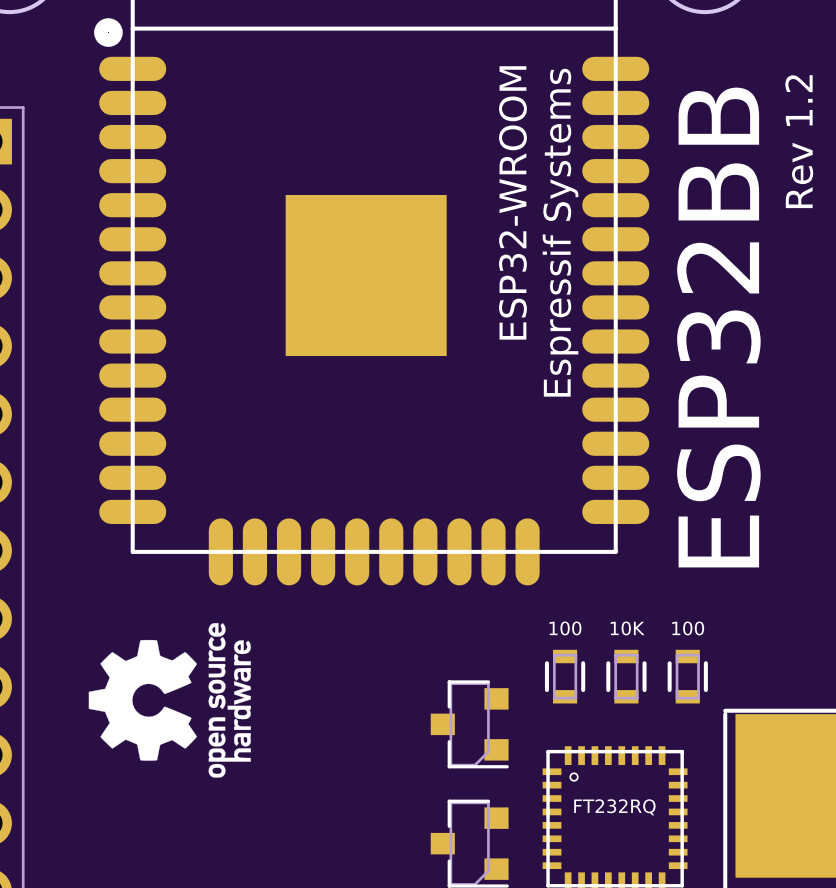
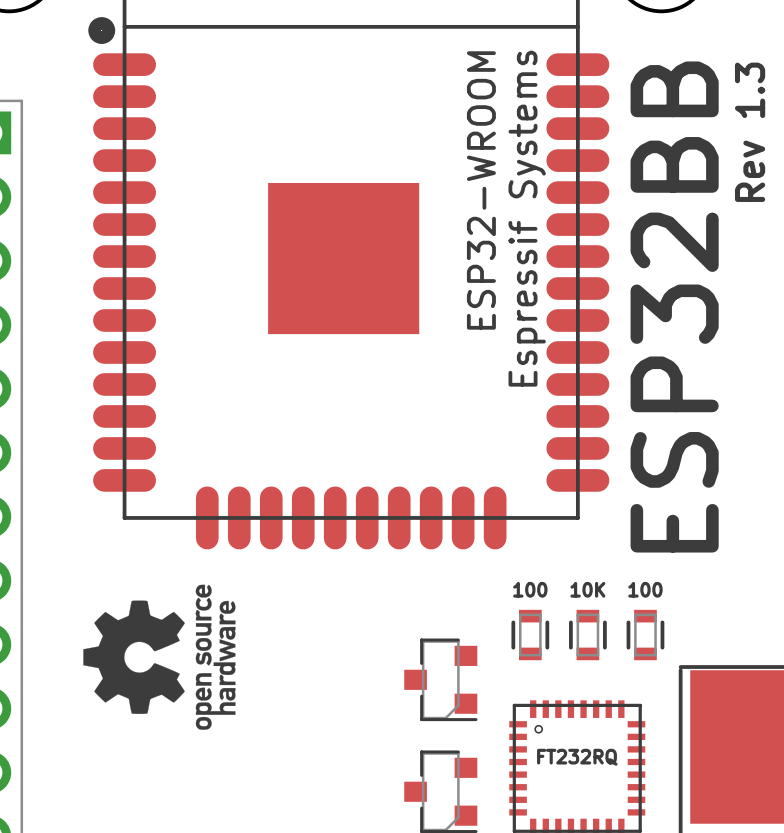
text: Rev 1.2 (799, 141) -> Rev 1.3 (750, 132)

